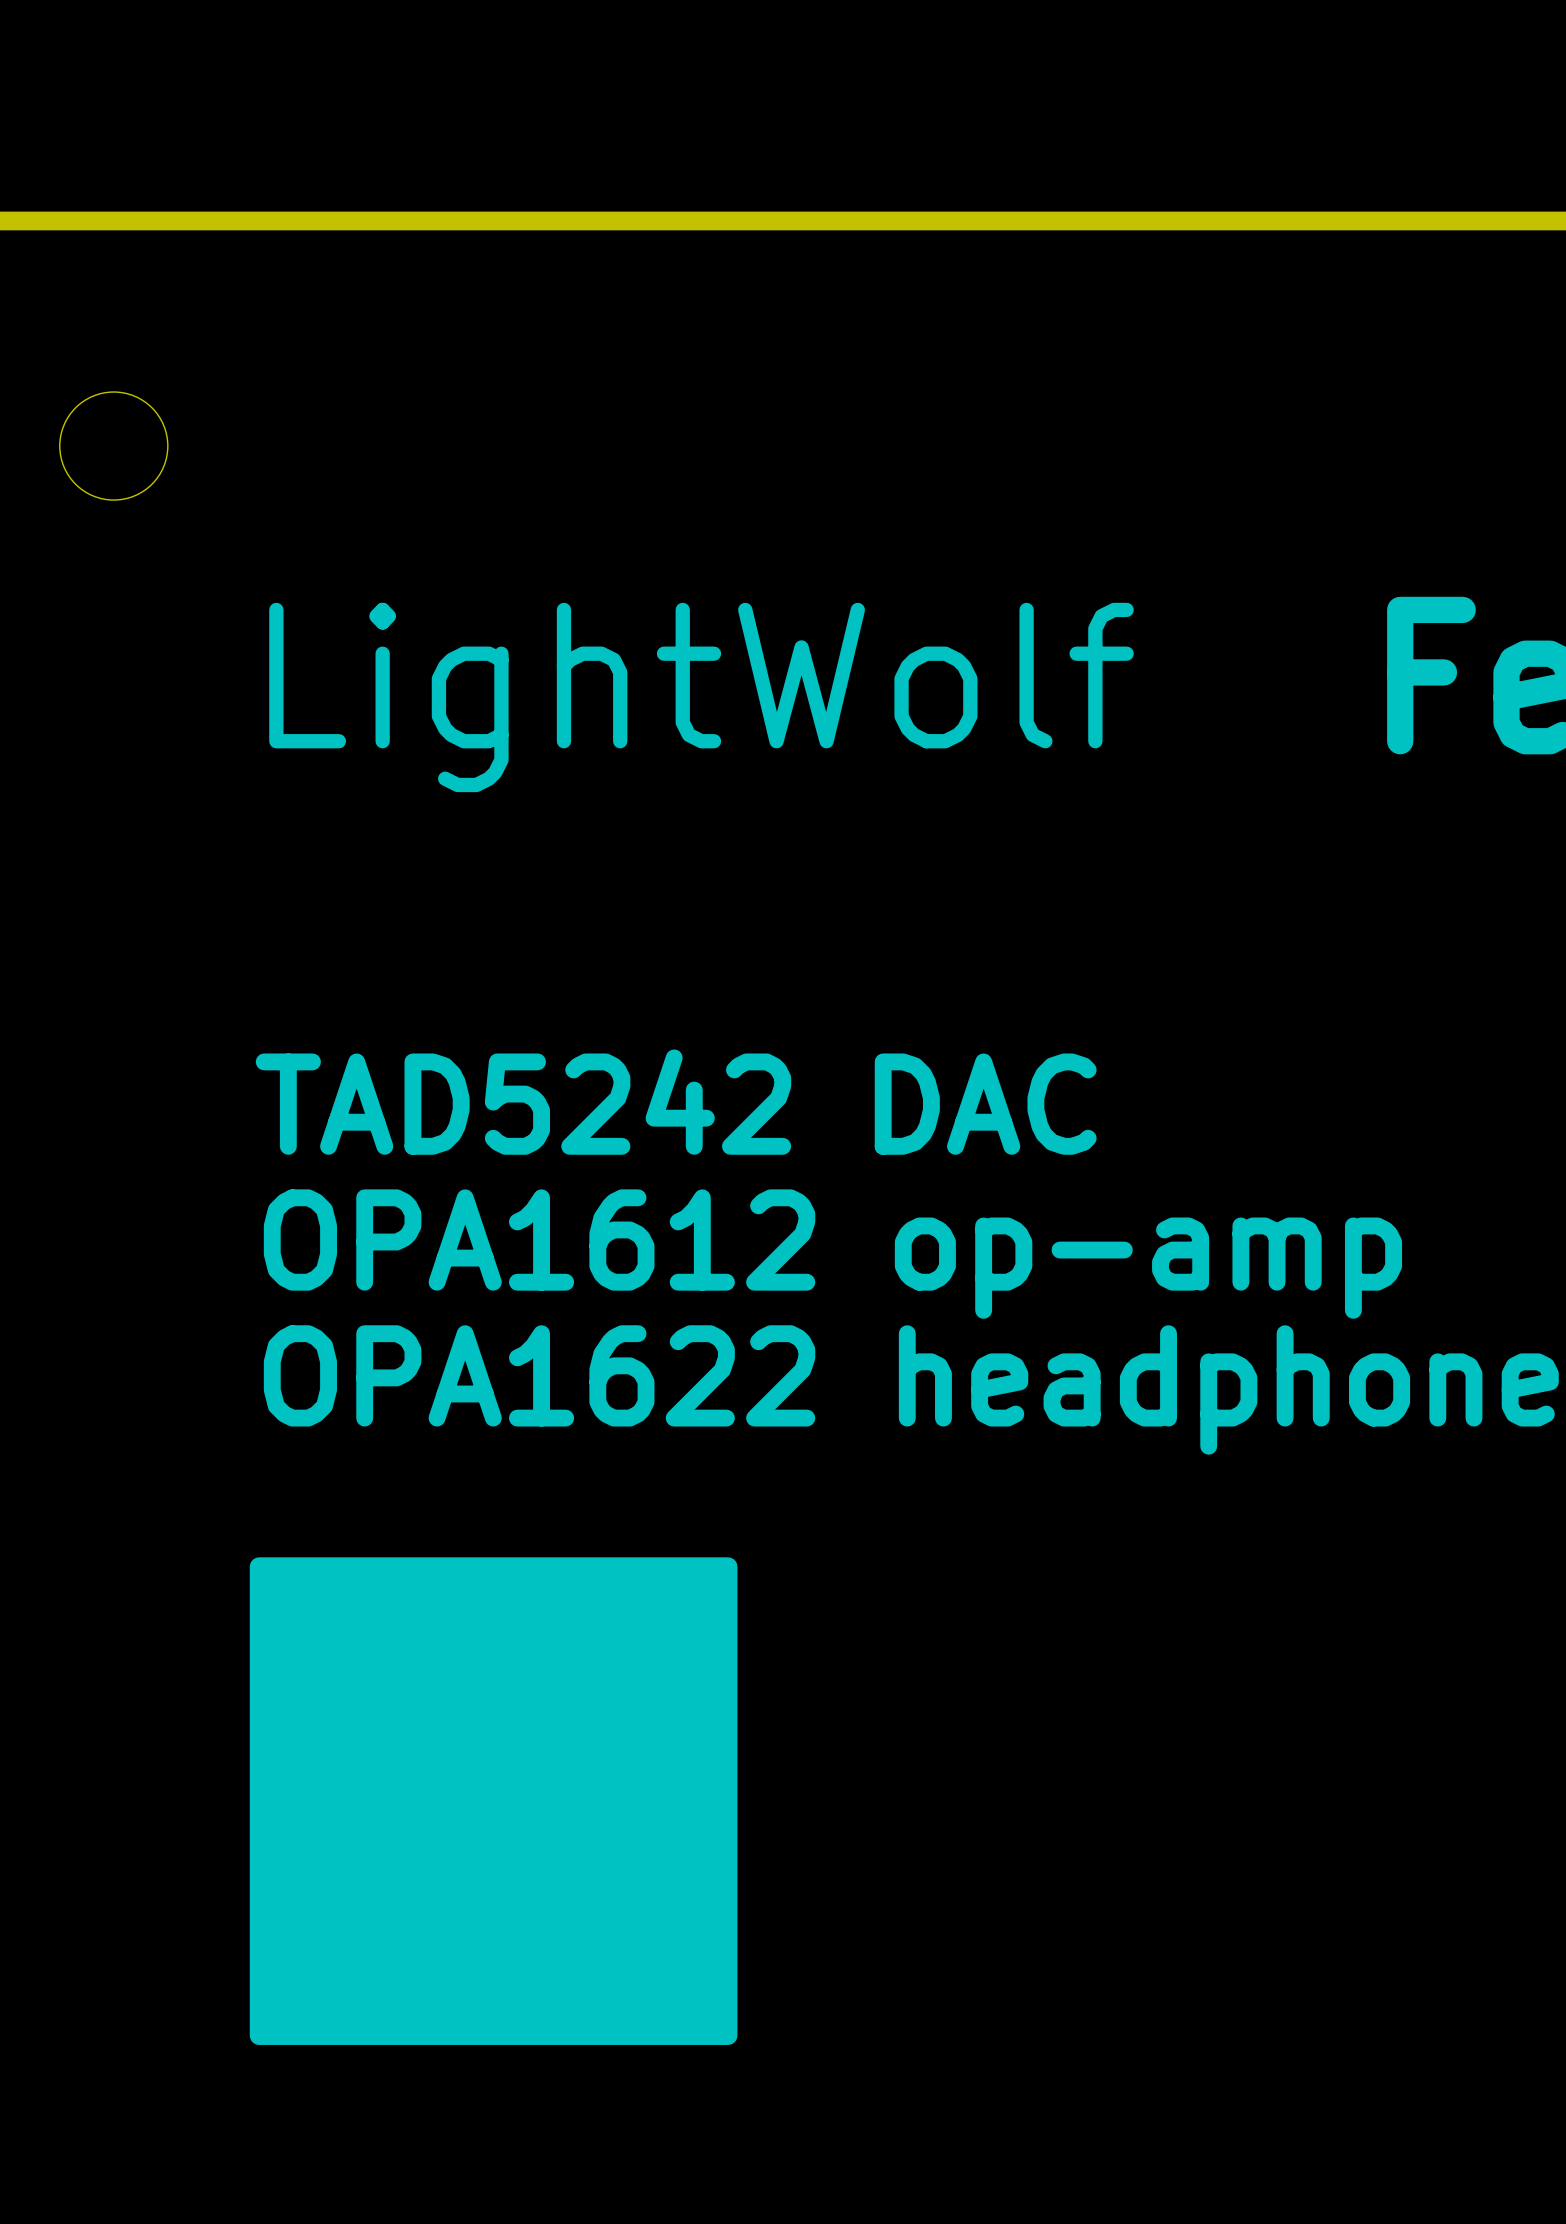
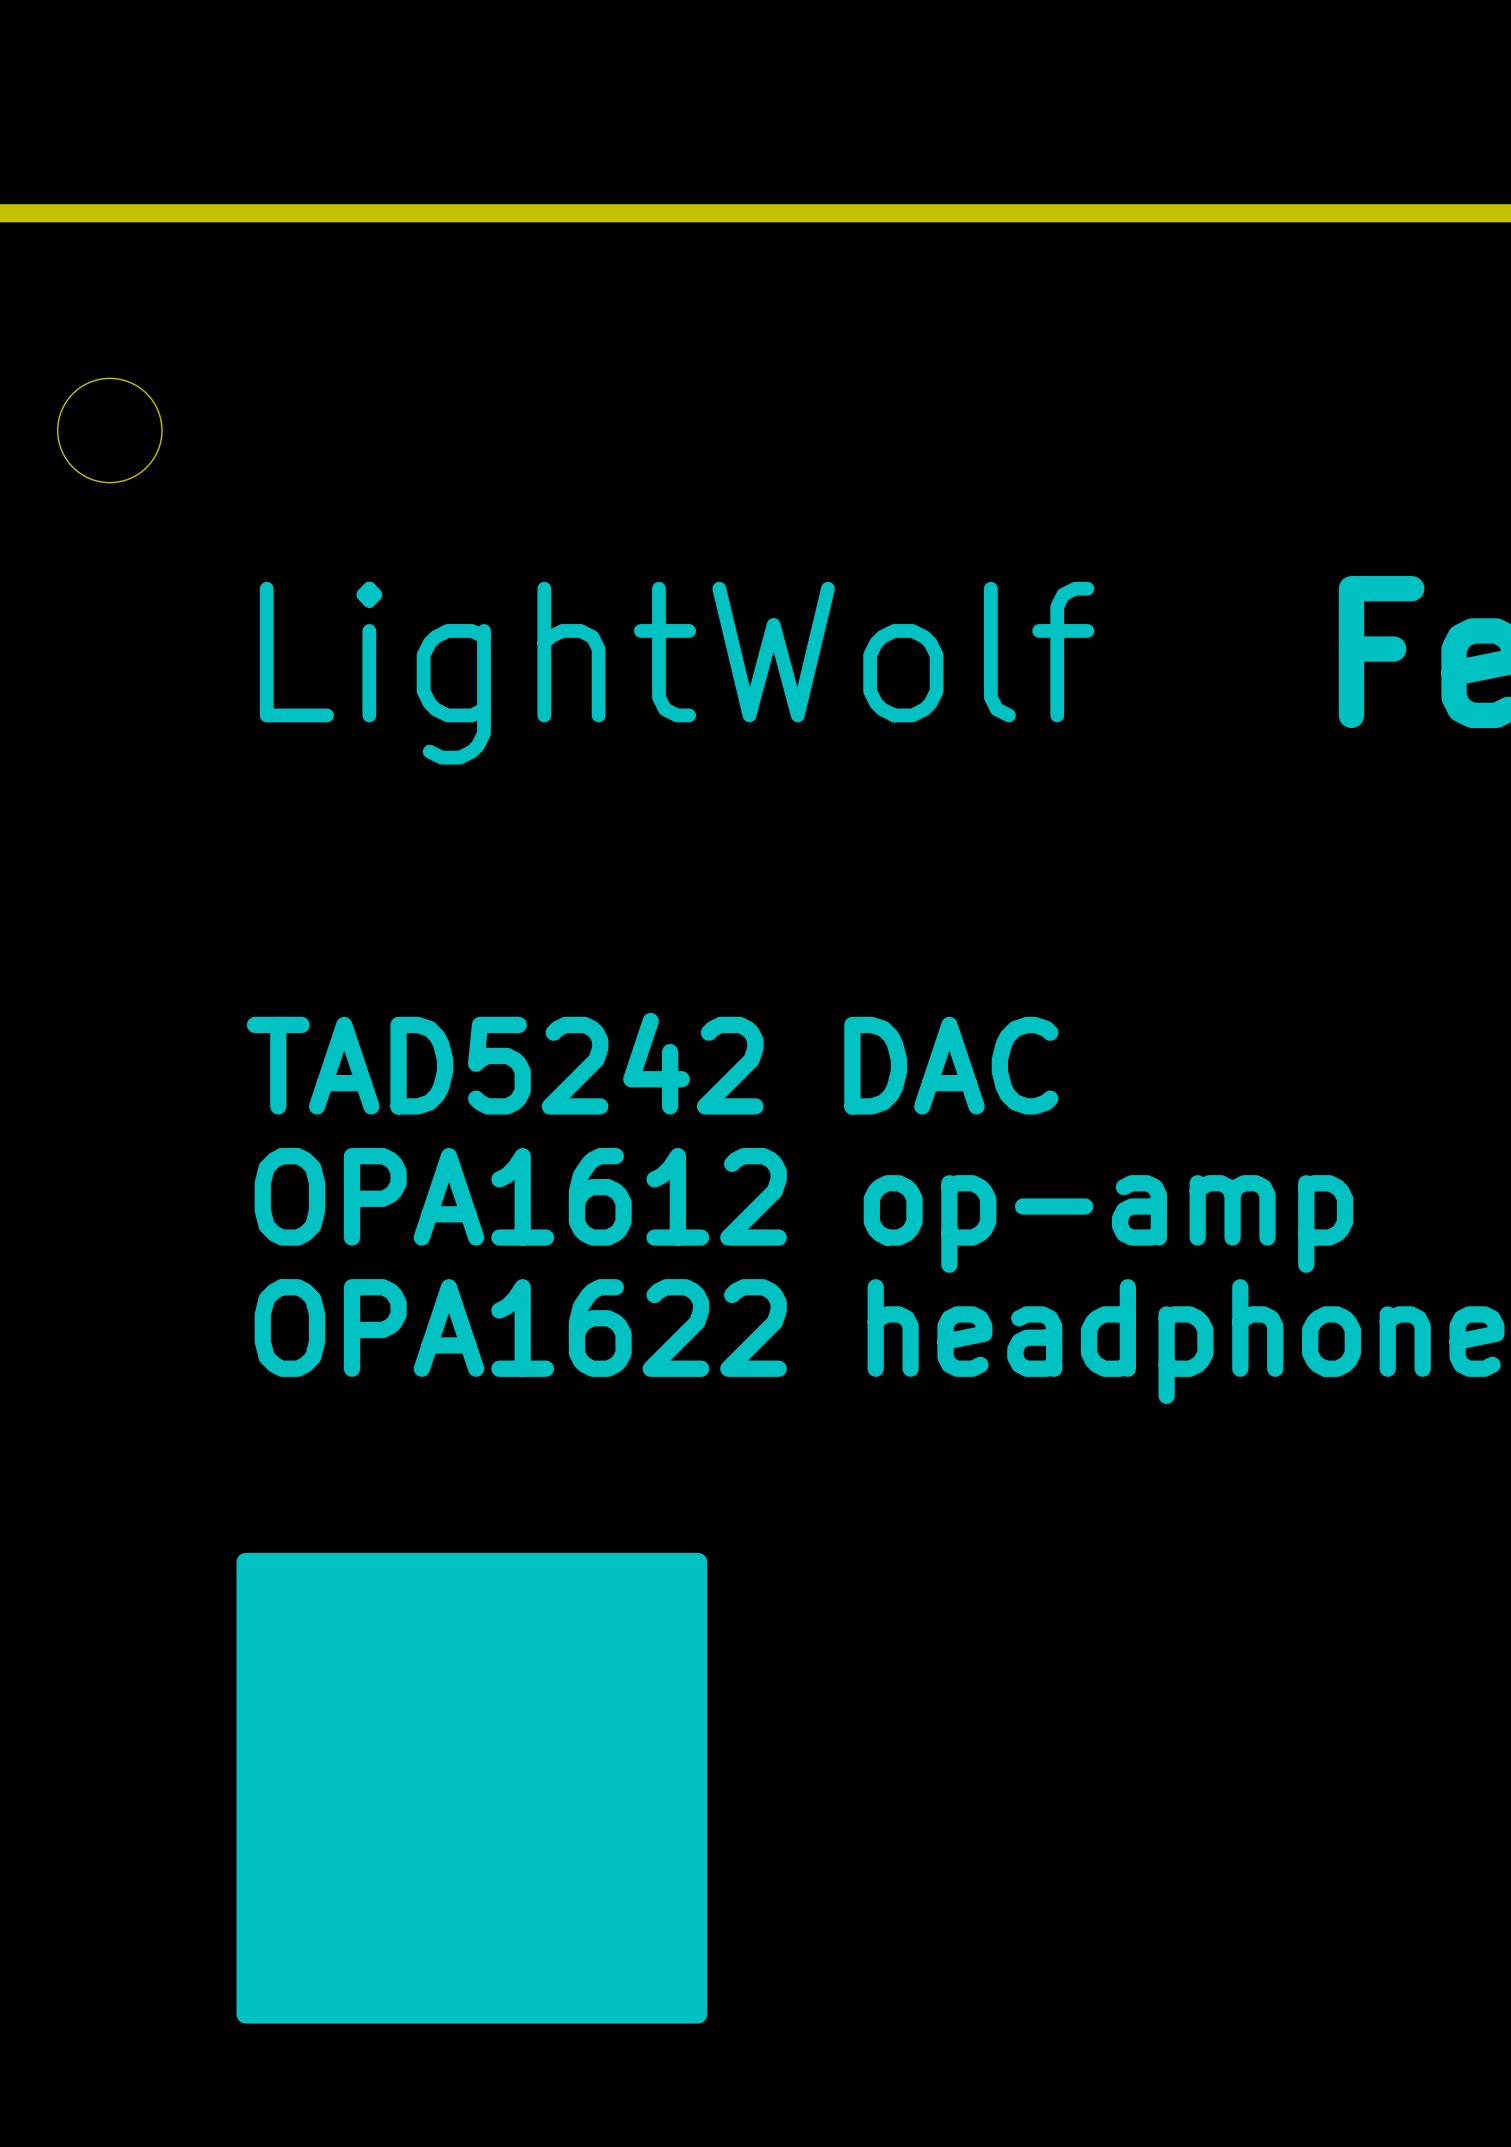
drawing position: (493, 1801) -> (471, 1788)

